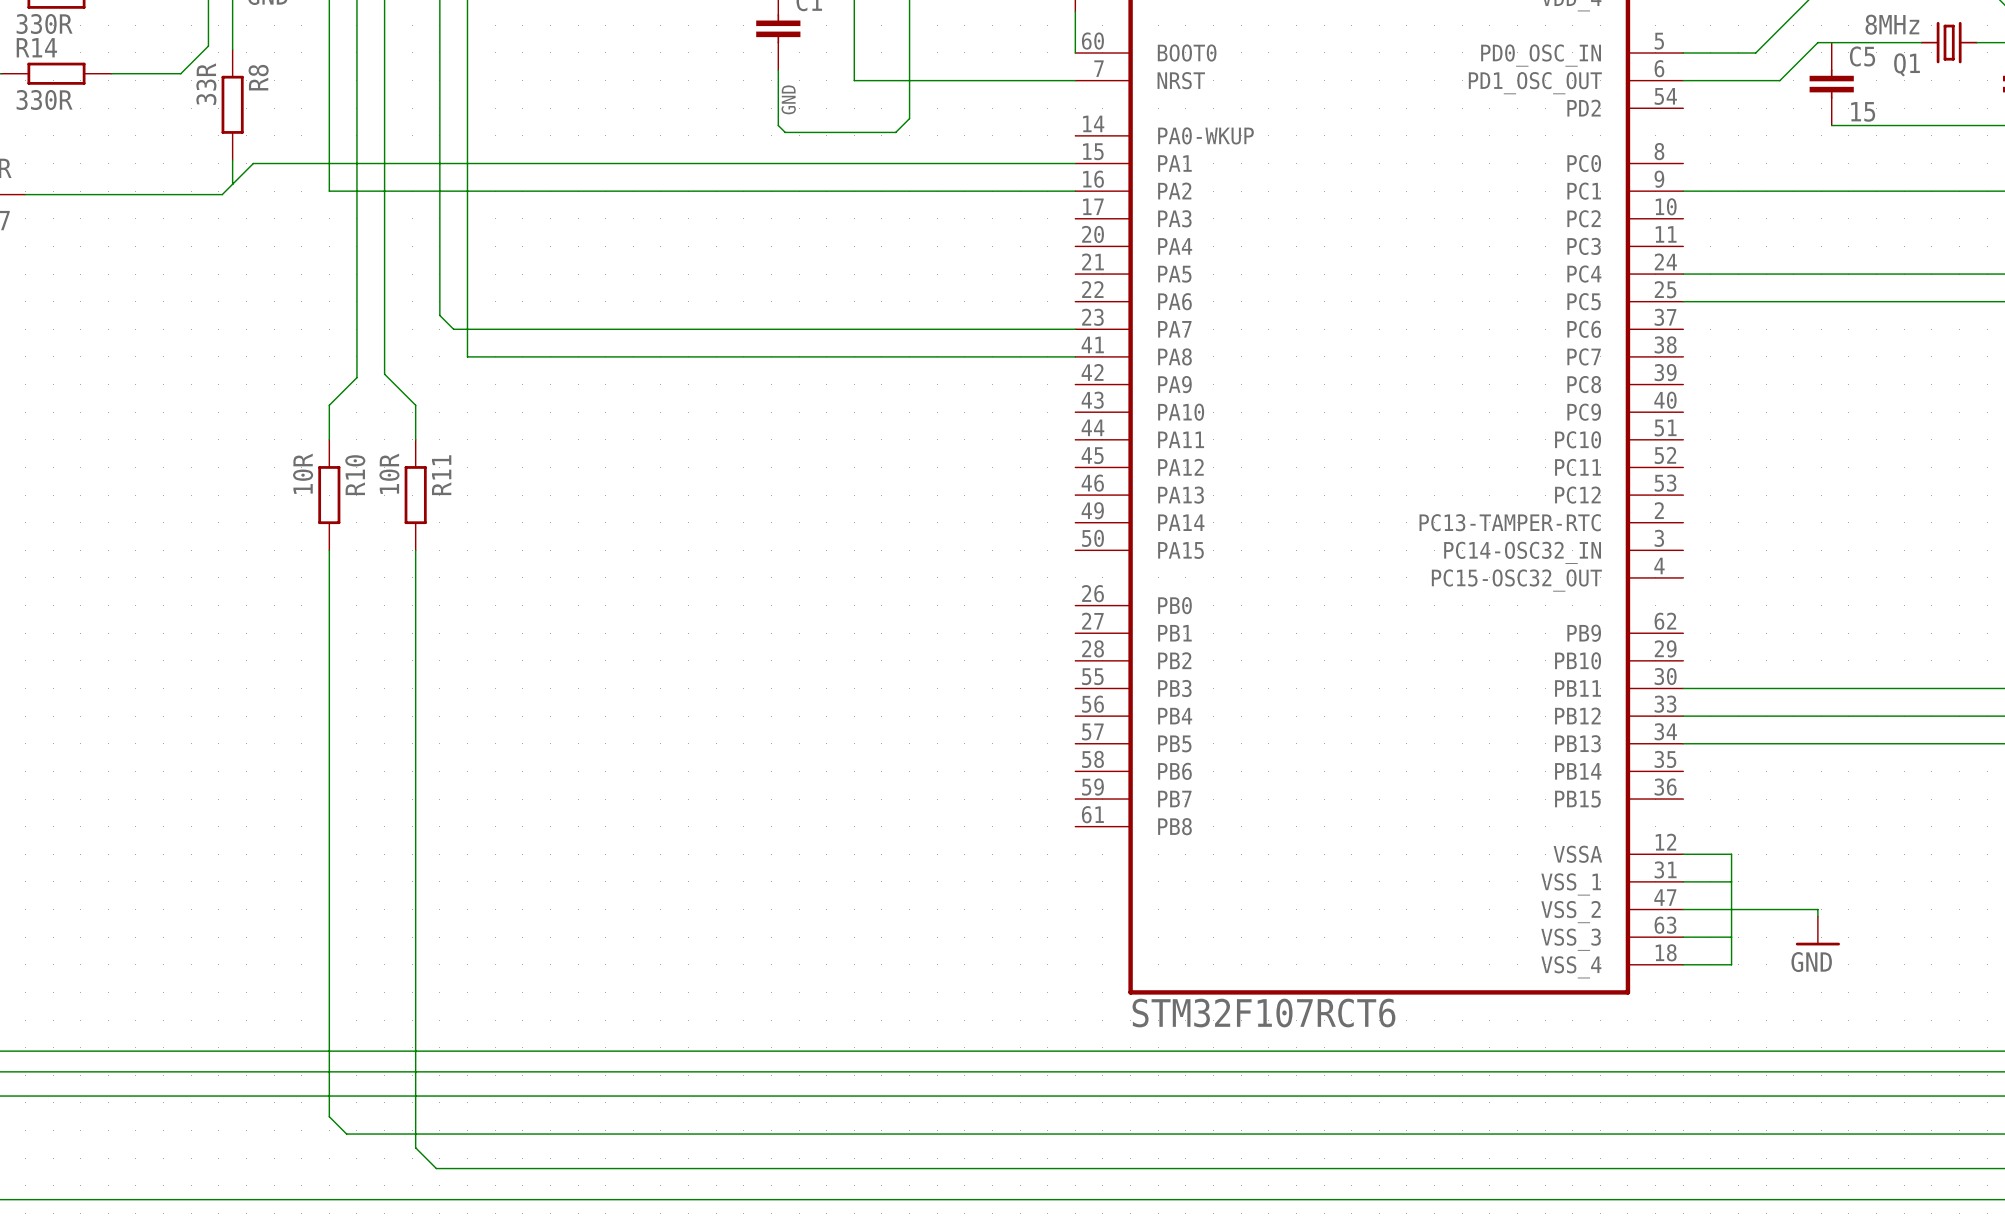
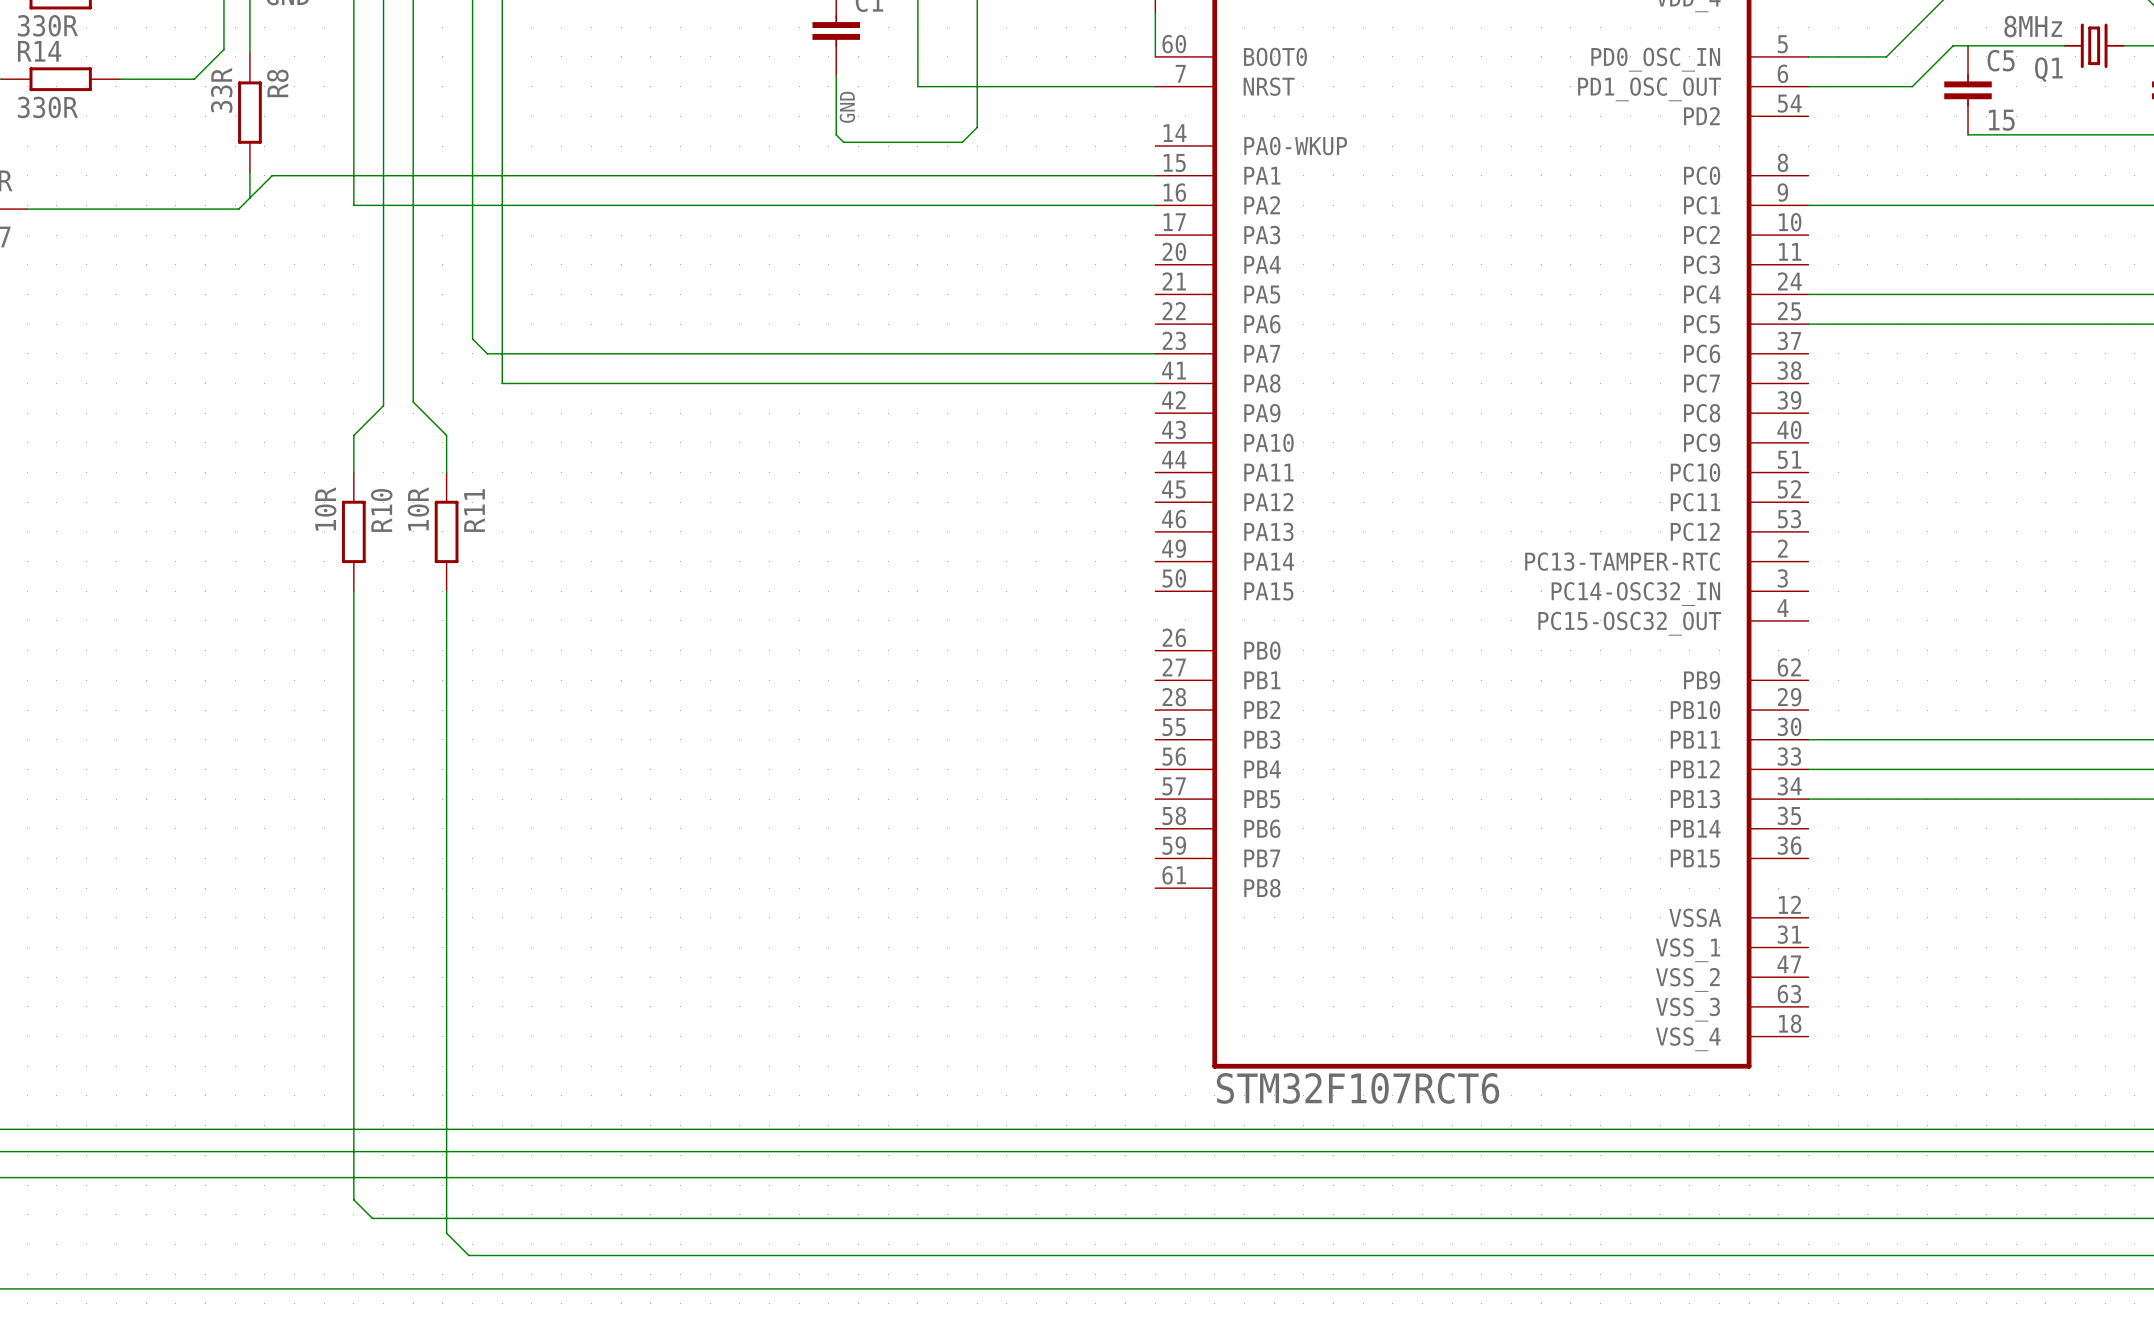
wire: (1683, 854) (1731, 854) (1731, 964) (1683, 964) -> none
wire: (1683, 881) (1731, 881) -> none
wire: (1683, 909) (1817, 909) (1817, 916) -> none
power symbol: GND (1817, 930) -> none
wire: (1683, 937) (1731, 937) -> none

